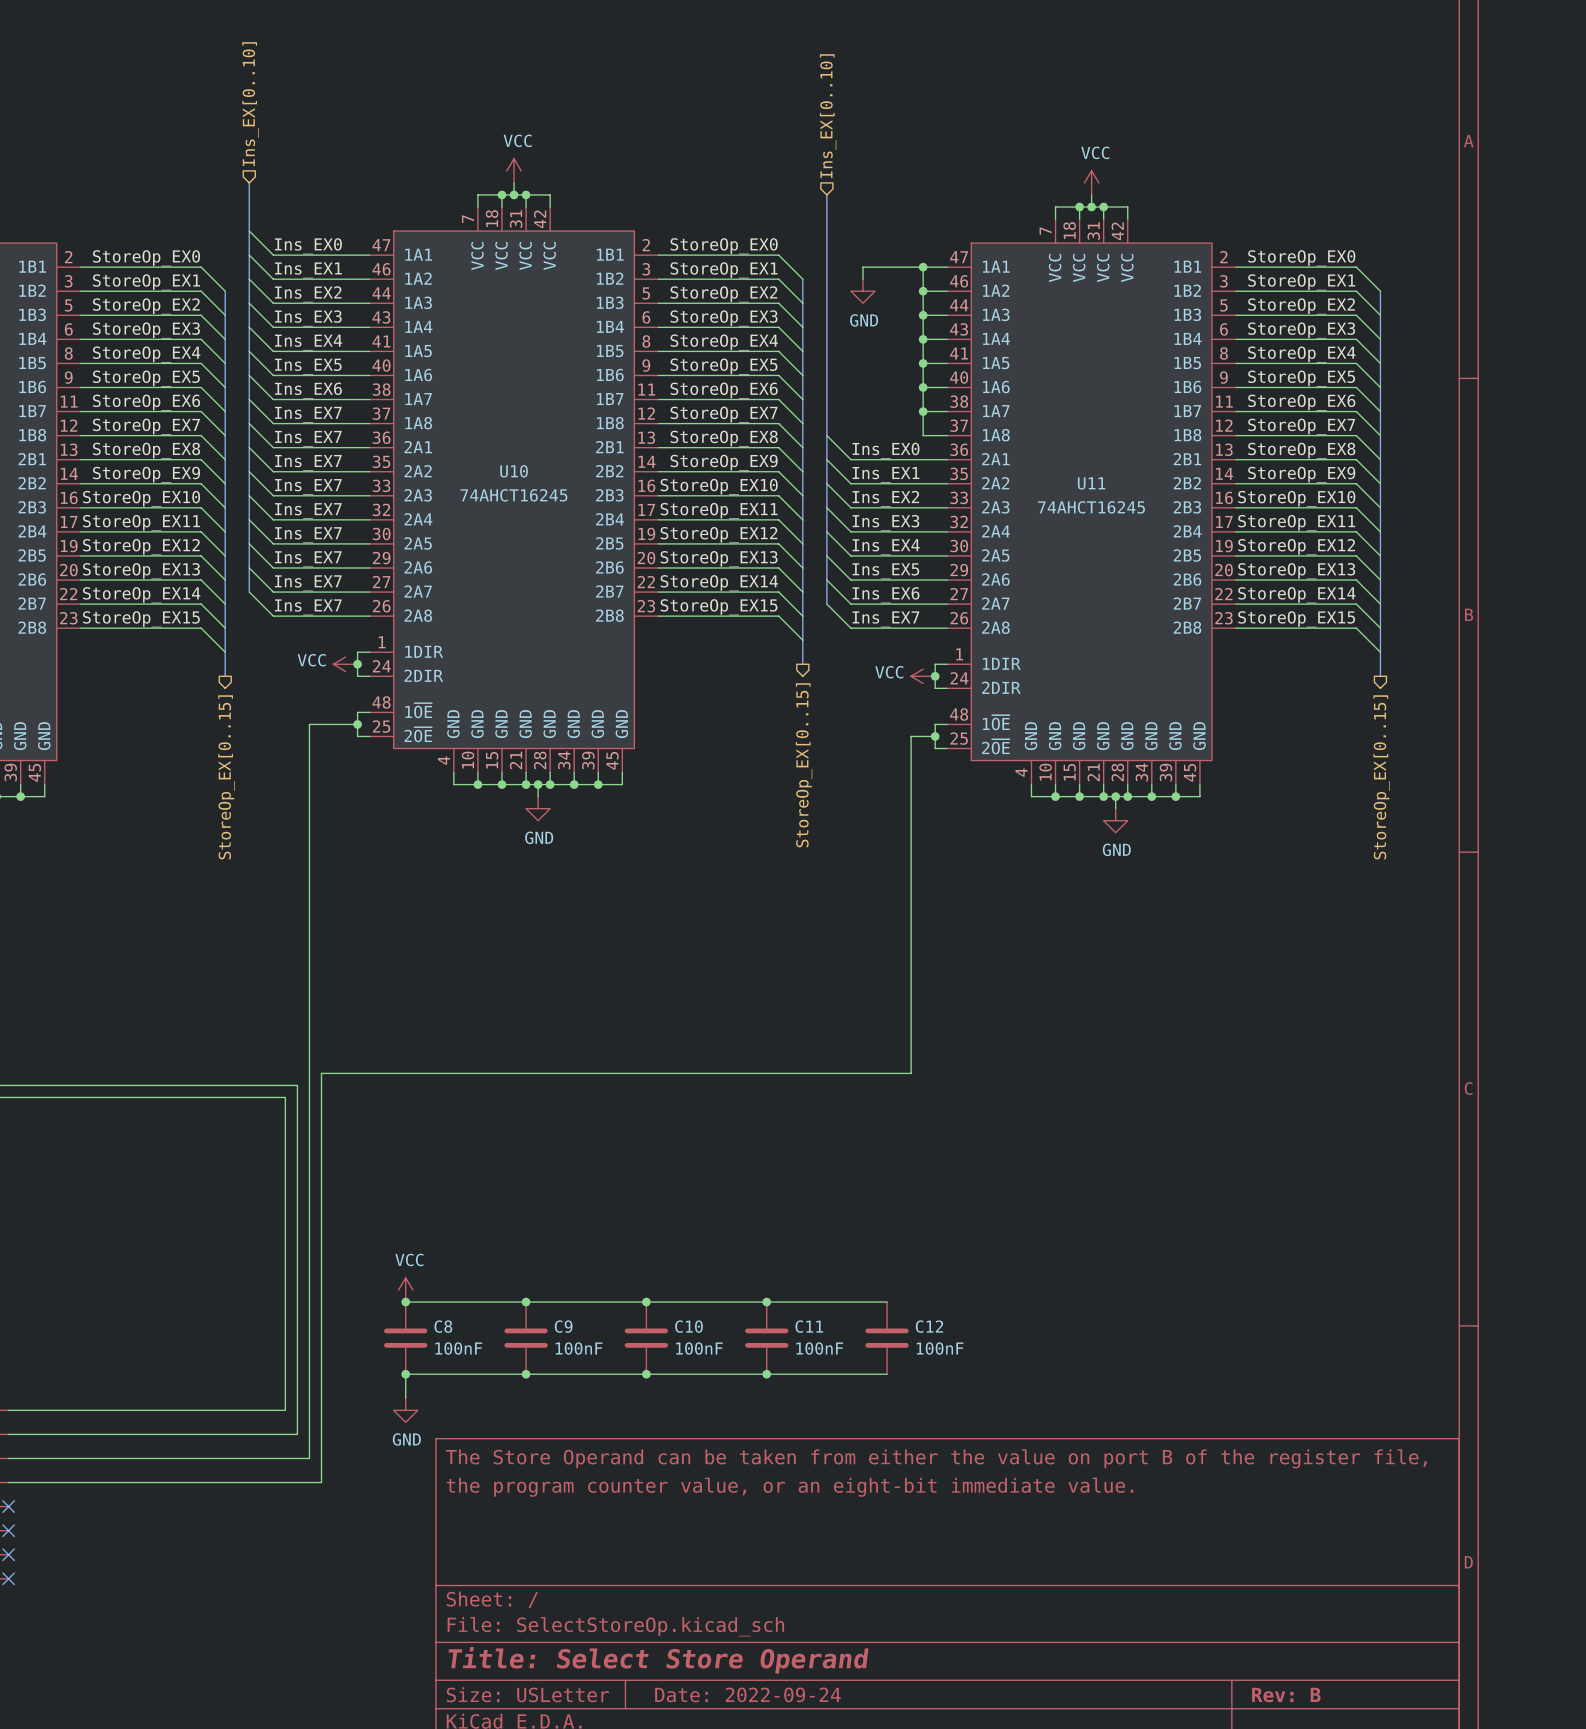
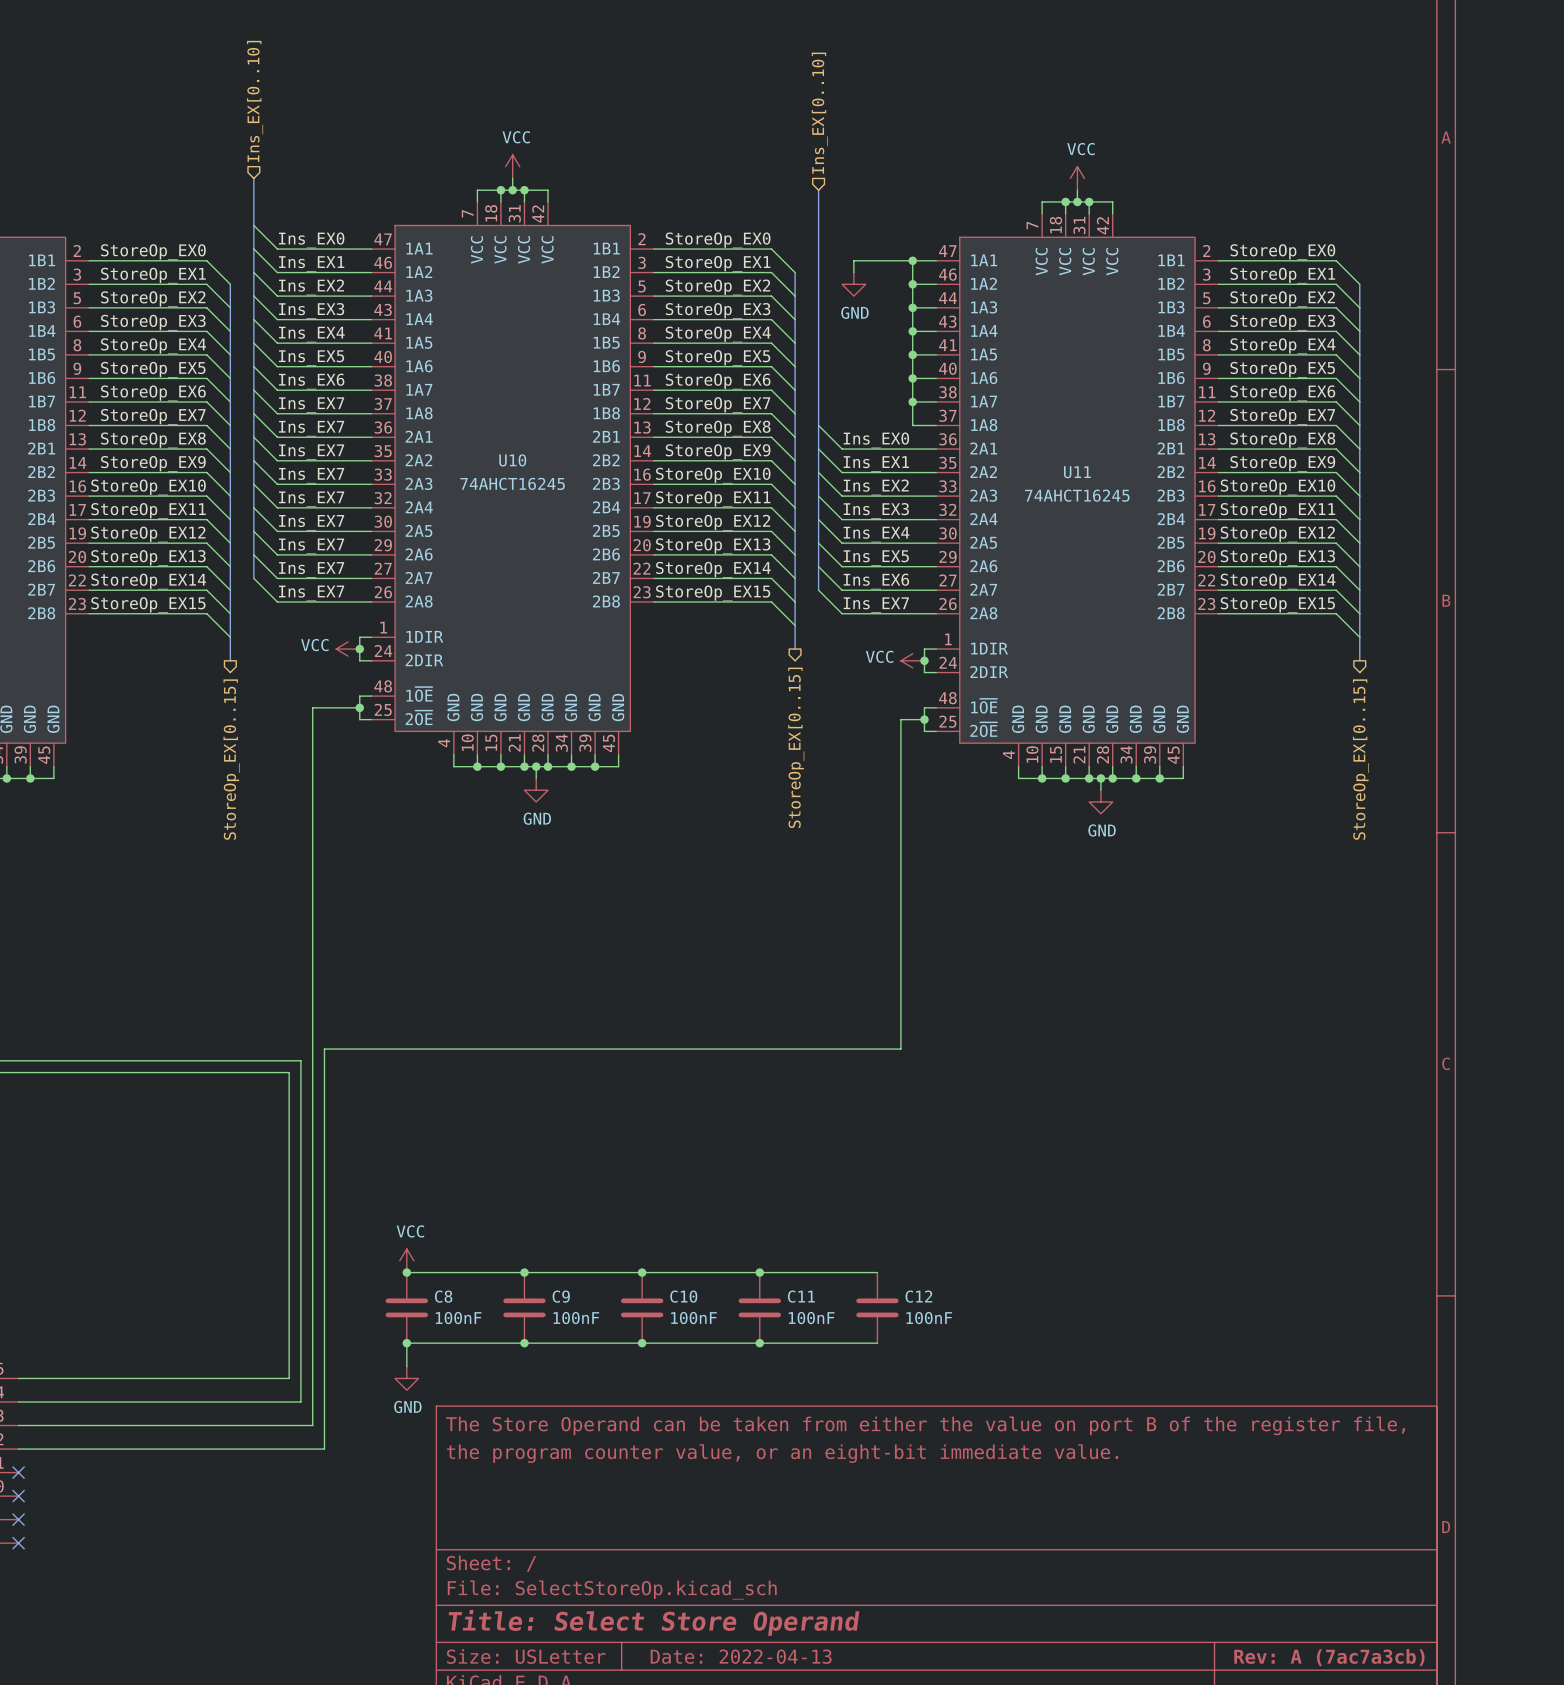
title block: Date: 2022-09-24 (747, 1694) -> Date: 2022-04-13 (741, 1656)
title block: Rev: B (1286, 1695) -> Rev: A (7ac7a3cb) (1329, 1657)

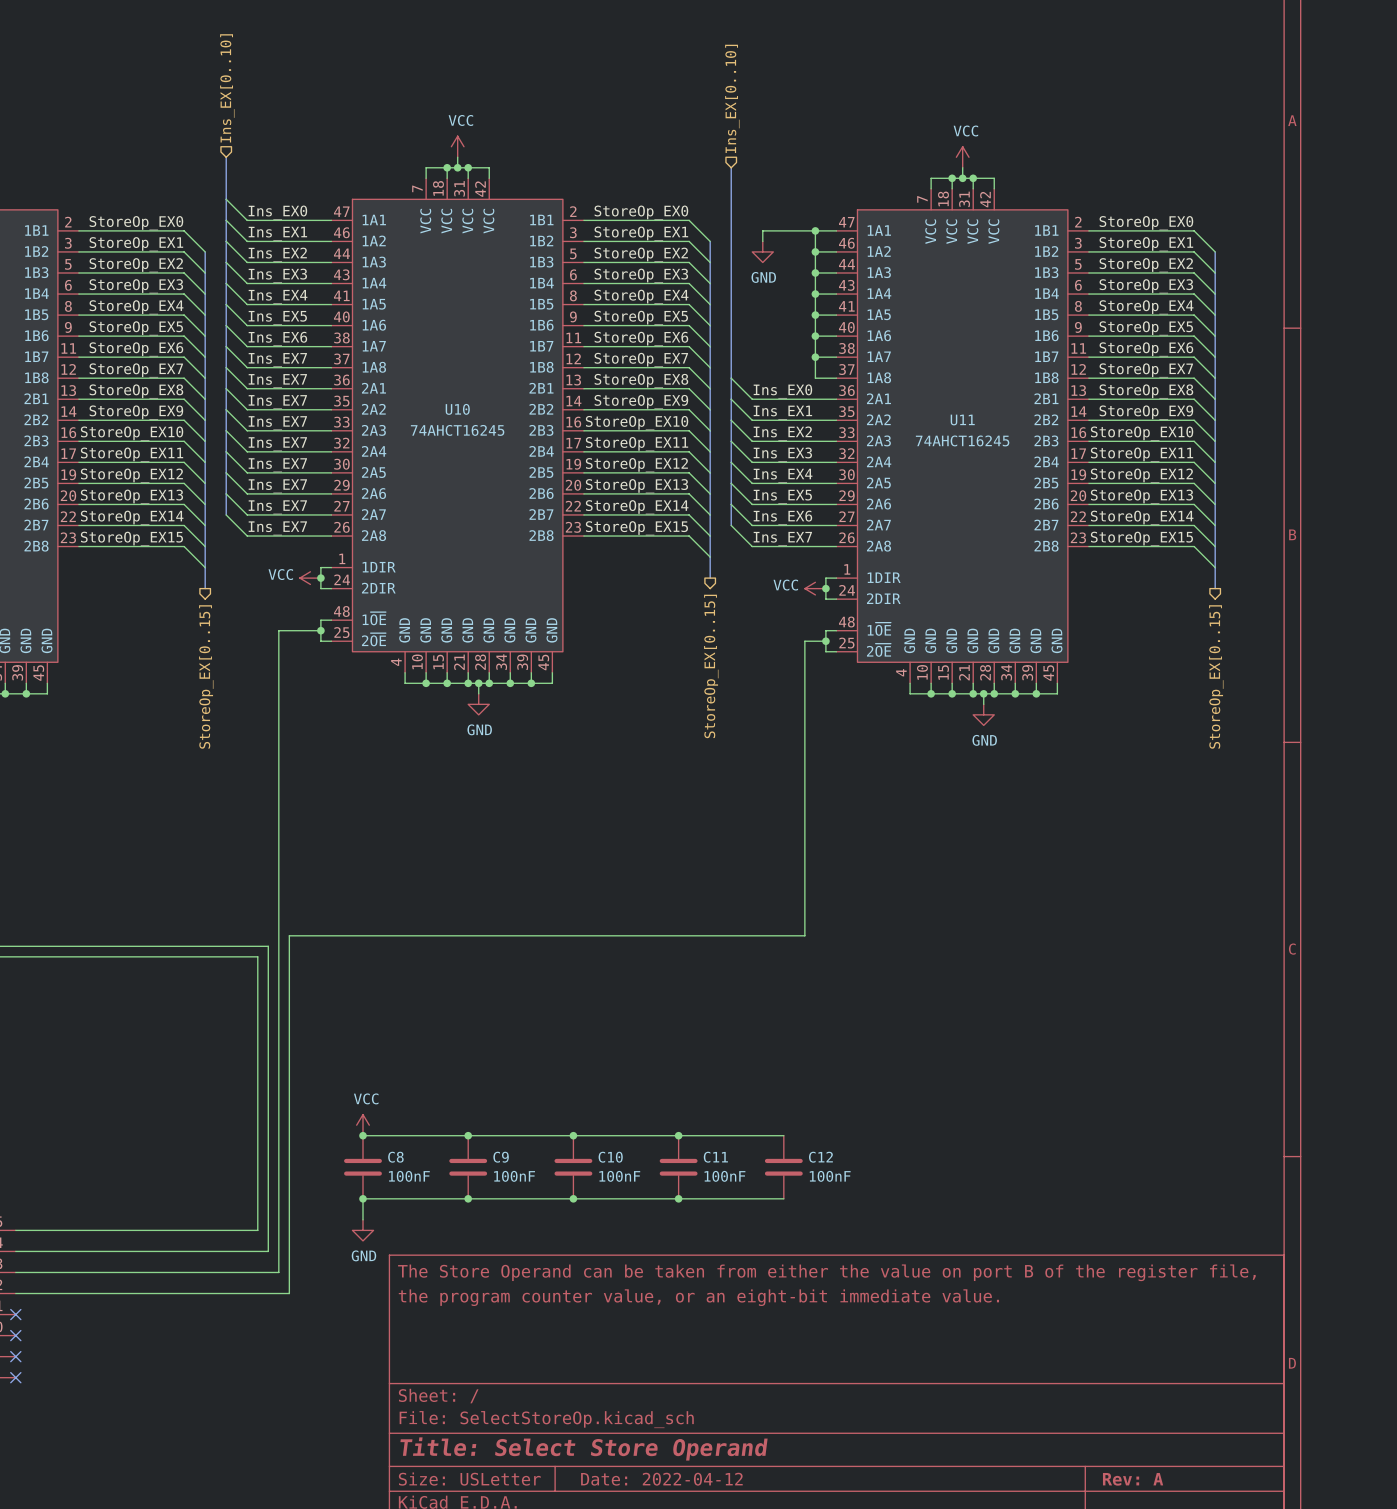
title block: Date: 2022-04-13 (741, 1656) -> Date: 2022-04-12 (661, 1479)
title block: Rev: A (7ac7a3cb) (1329, 1657) -> Rev: A (1133, 1479)

